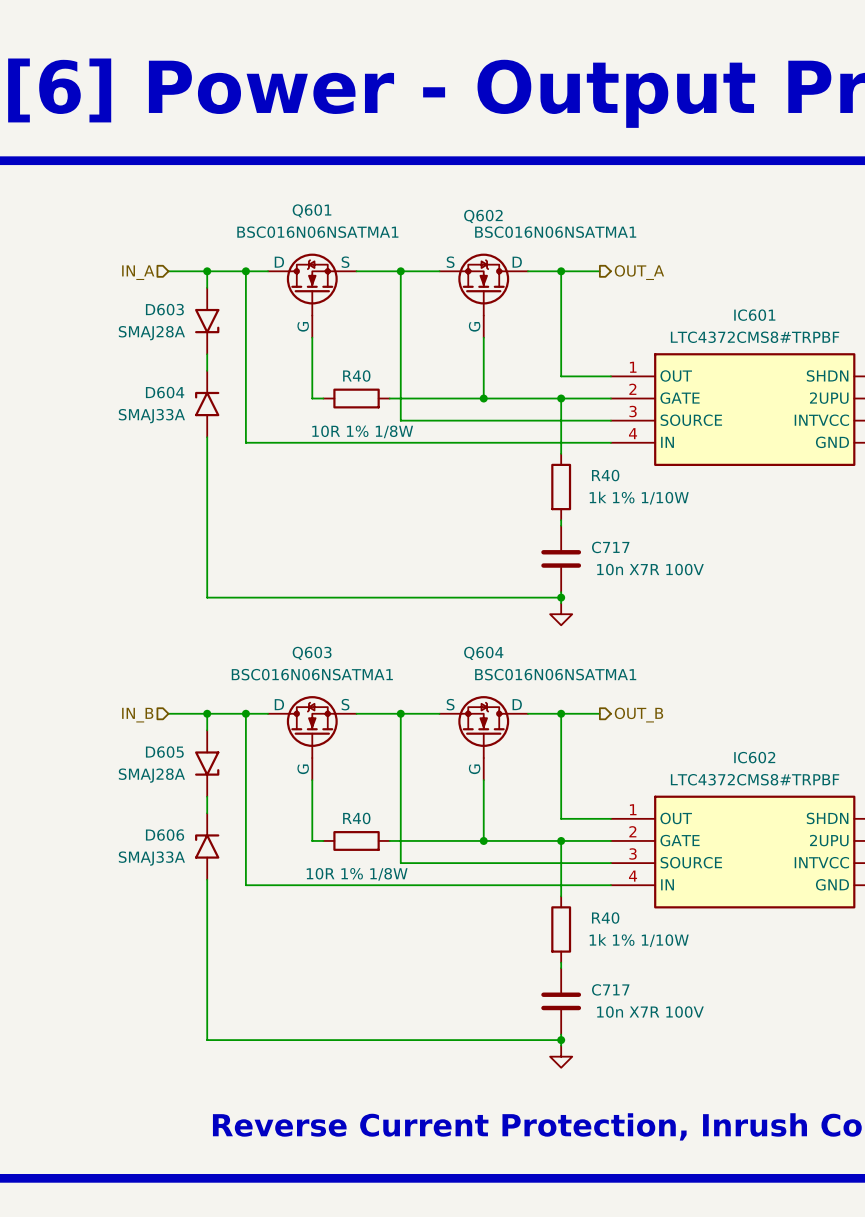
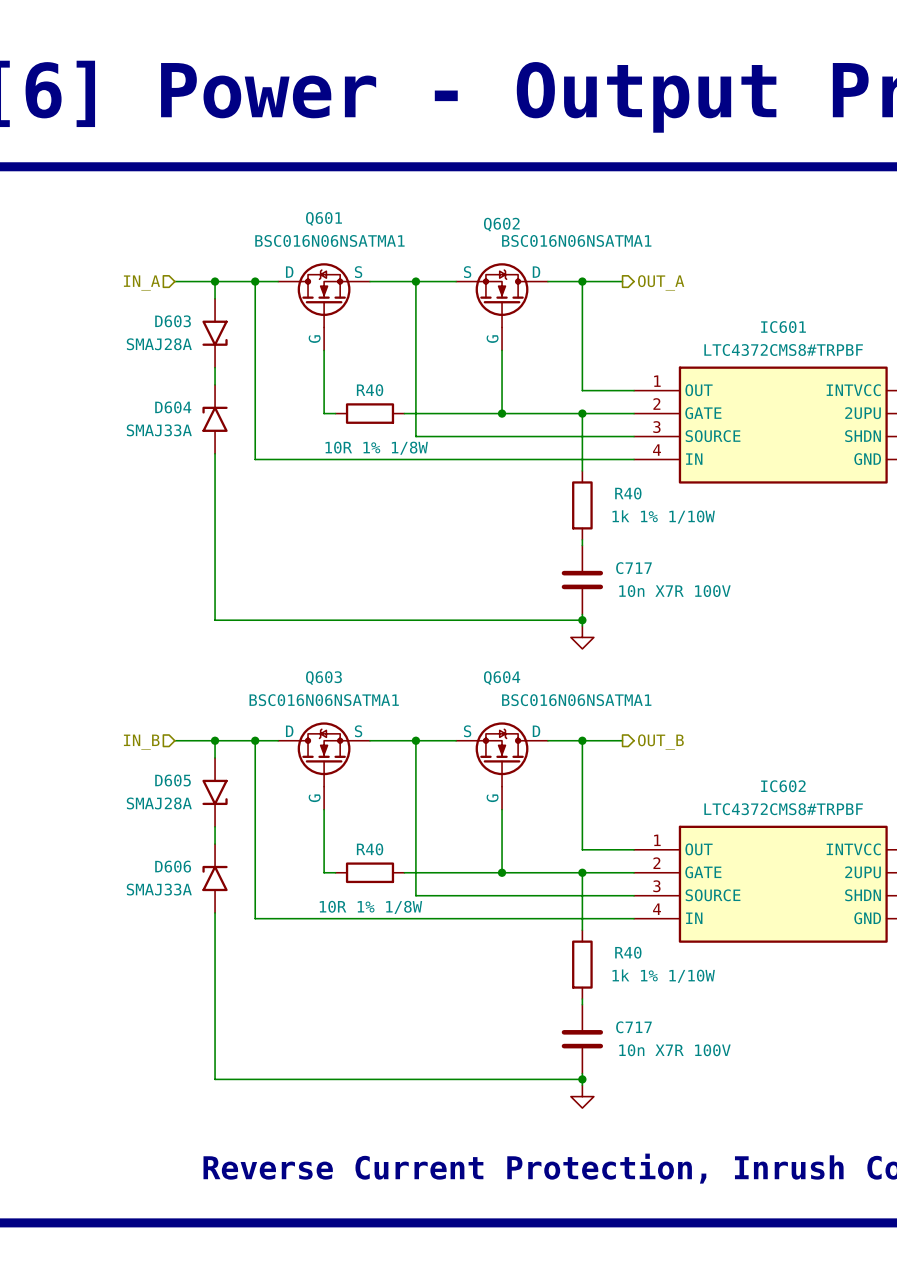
IC601 pin name: SHDN (827, 375) -> INTVCC (853, 390)
IC601 pin name: INTVCC (821, 420) -> SHDN (863, 436)
IC602 pin name: SHDN (827, 818) -> INTVCC (853, 849)
IC602 pin name: INTVCC (821, 862) -> SHDN (863, 895)

